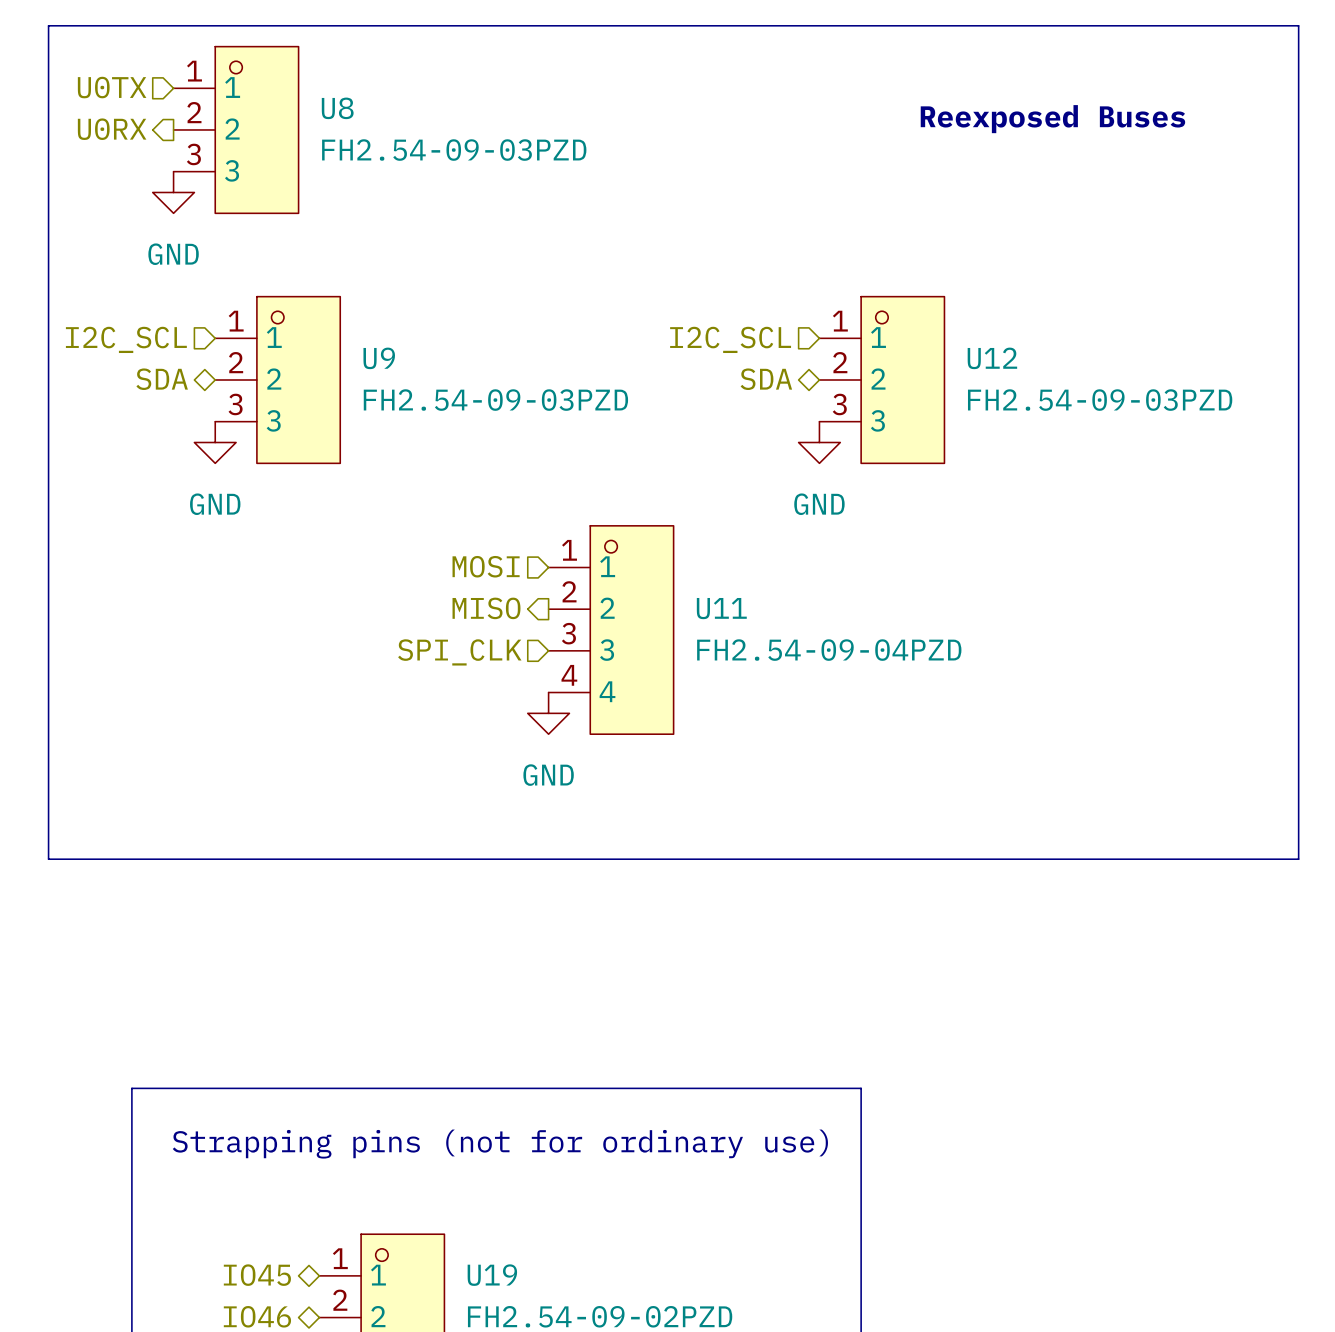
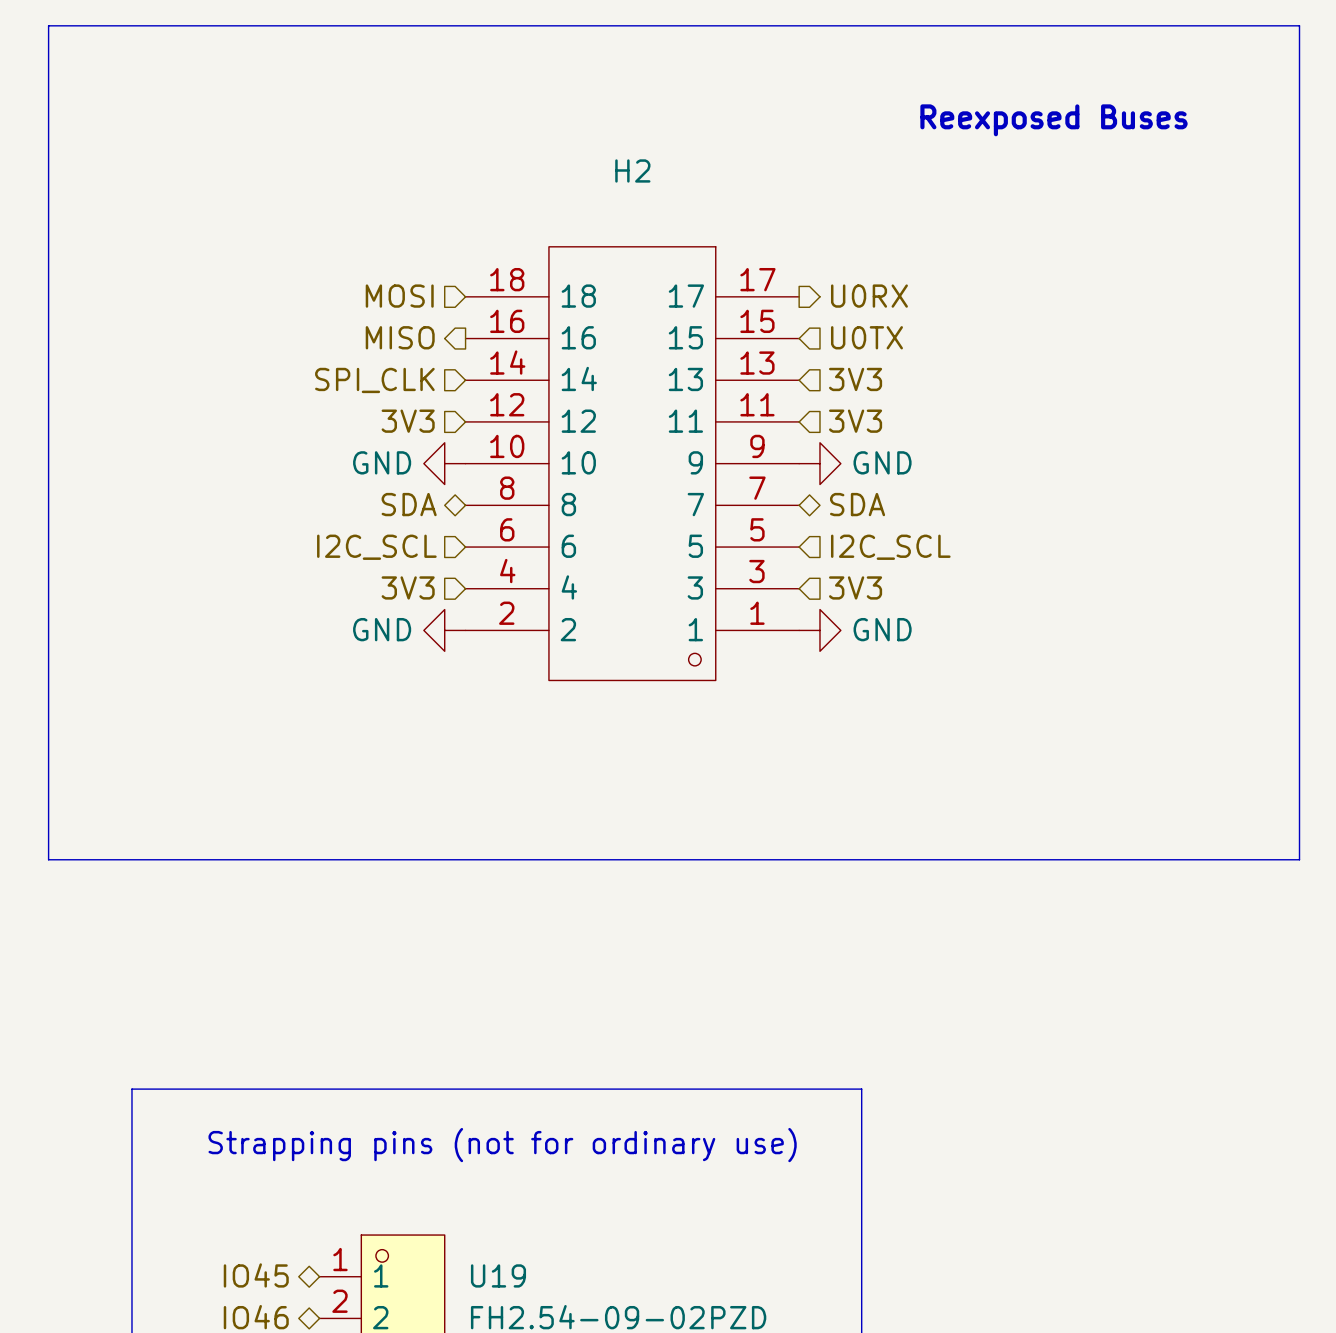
hierarchical label: U0TX (112, 87) -> none
hierarchical label: U0RX (112, 129) -> none
U8: FH2.54-09-03PZD (236, 129) -> none
power symbol: GND (173, 192) -> none
hierarchical label: none -> U0RX (869, 296)
hierarchical label: none -> U0TX (866, 337)
hierarchical label: I2C_SCL (126, 339) -> none
hierarchical label: I2C_SCL (730, 339) -> none
hierarchical label: SDA (162, 379) -> none
hierarchical label rotation: 0° (766, 379) -> 180° (857, 504)
hierarchical label position: SDA (766, 379) -> SDA (857, 504)
hierarchical label: none -> 3V3 (855, 379)
U9: FH2.54-09-03PZD (277, 380) -> none
U12: FH2.54-09-03PZD (881, 380) -> none
hierarchical label: none -> 3V3 (408, 421)
hierarchical label: none -> 3V3 (855, 421)
power symbol: GND (215, 442) -> none
power symbol rotation: 0° (819, 442) -> 90° counterclockwise (819, 463)
power symbol: none -> GND (444, 463)
H2: none -> (632, 463)
hierarchical label: none -> SDA (409, 504)
hierarchical label: none -> I2C_SCL (376, 547)
hierarchical label: none -> I2C_SCL (890, 547)
hierarchical label position: MOSI (486, 566) -> MOSI (399, 296)
hierarchical label: none -> 3V3 (408, 587)
hierarchical label: none -> 3V3 (855, 587)
hierarchical label position: MISO (486, 608) -> MISO (400, 337)
U11: FH2.54-09-04PZD (611, 630) -> none
power symbol: none -> GND (819, 630)
hierarchical label position: SPI_CLK (459, 652) -> SPI_CLK (374, 380)
power symbol rotation: 0° (548, 713) -> 90° clockwise (444, 630)
power symbol position: GND (548, 713) -> GND (444, 630)

